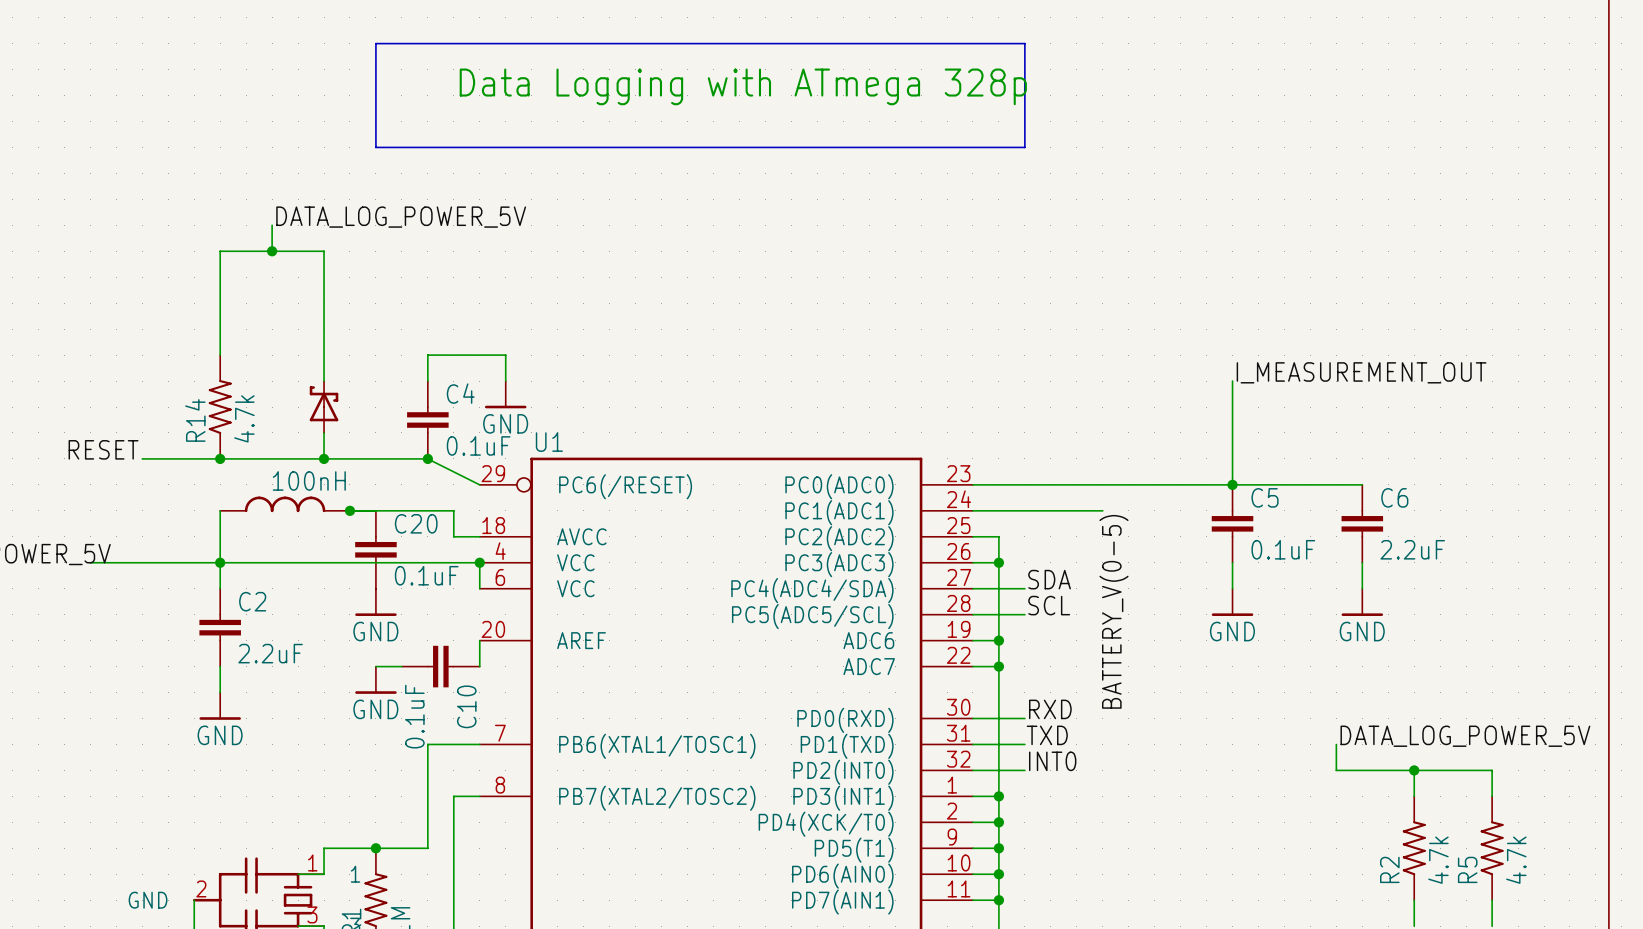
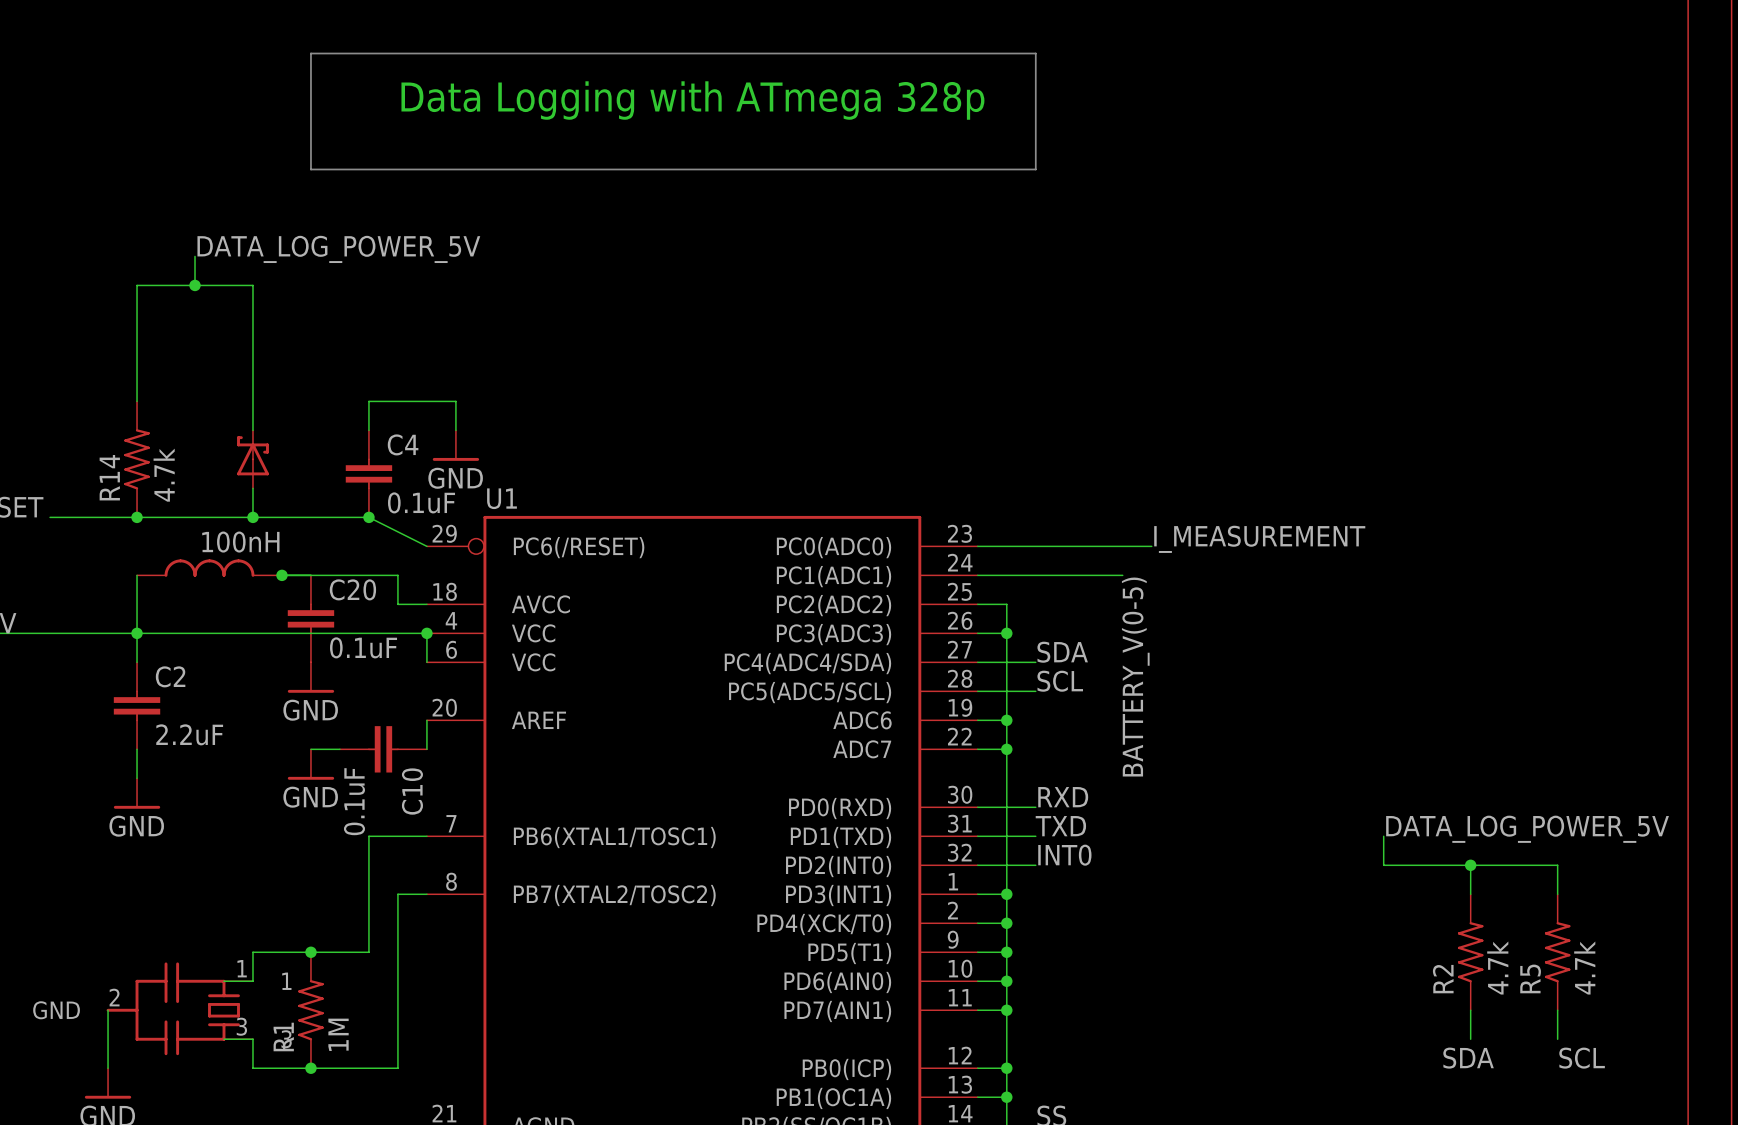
label: I_MEASUREMENT_OUT (1361, 372) -> none
wire: (1232, 381) (1232, 484) -> none
label: none -> I_MEASUREMENT (1259, 539)
wire: (1128, 484) (1362, 484) -> none
junction: (1232, 484) -> none
C5: 0.1uF (1232, 523) -> none
C6: 2.2uF (1362, 523) -> none
wire: (1232, 562) (1232, 588) -> none
wire: (1362, 562) (1362, 588) -> none
power symbol: GND (1232, 602) -> none
power symbol: GND (1362, 602) -> none

